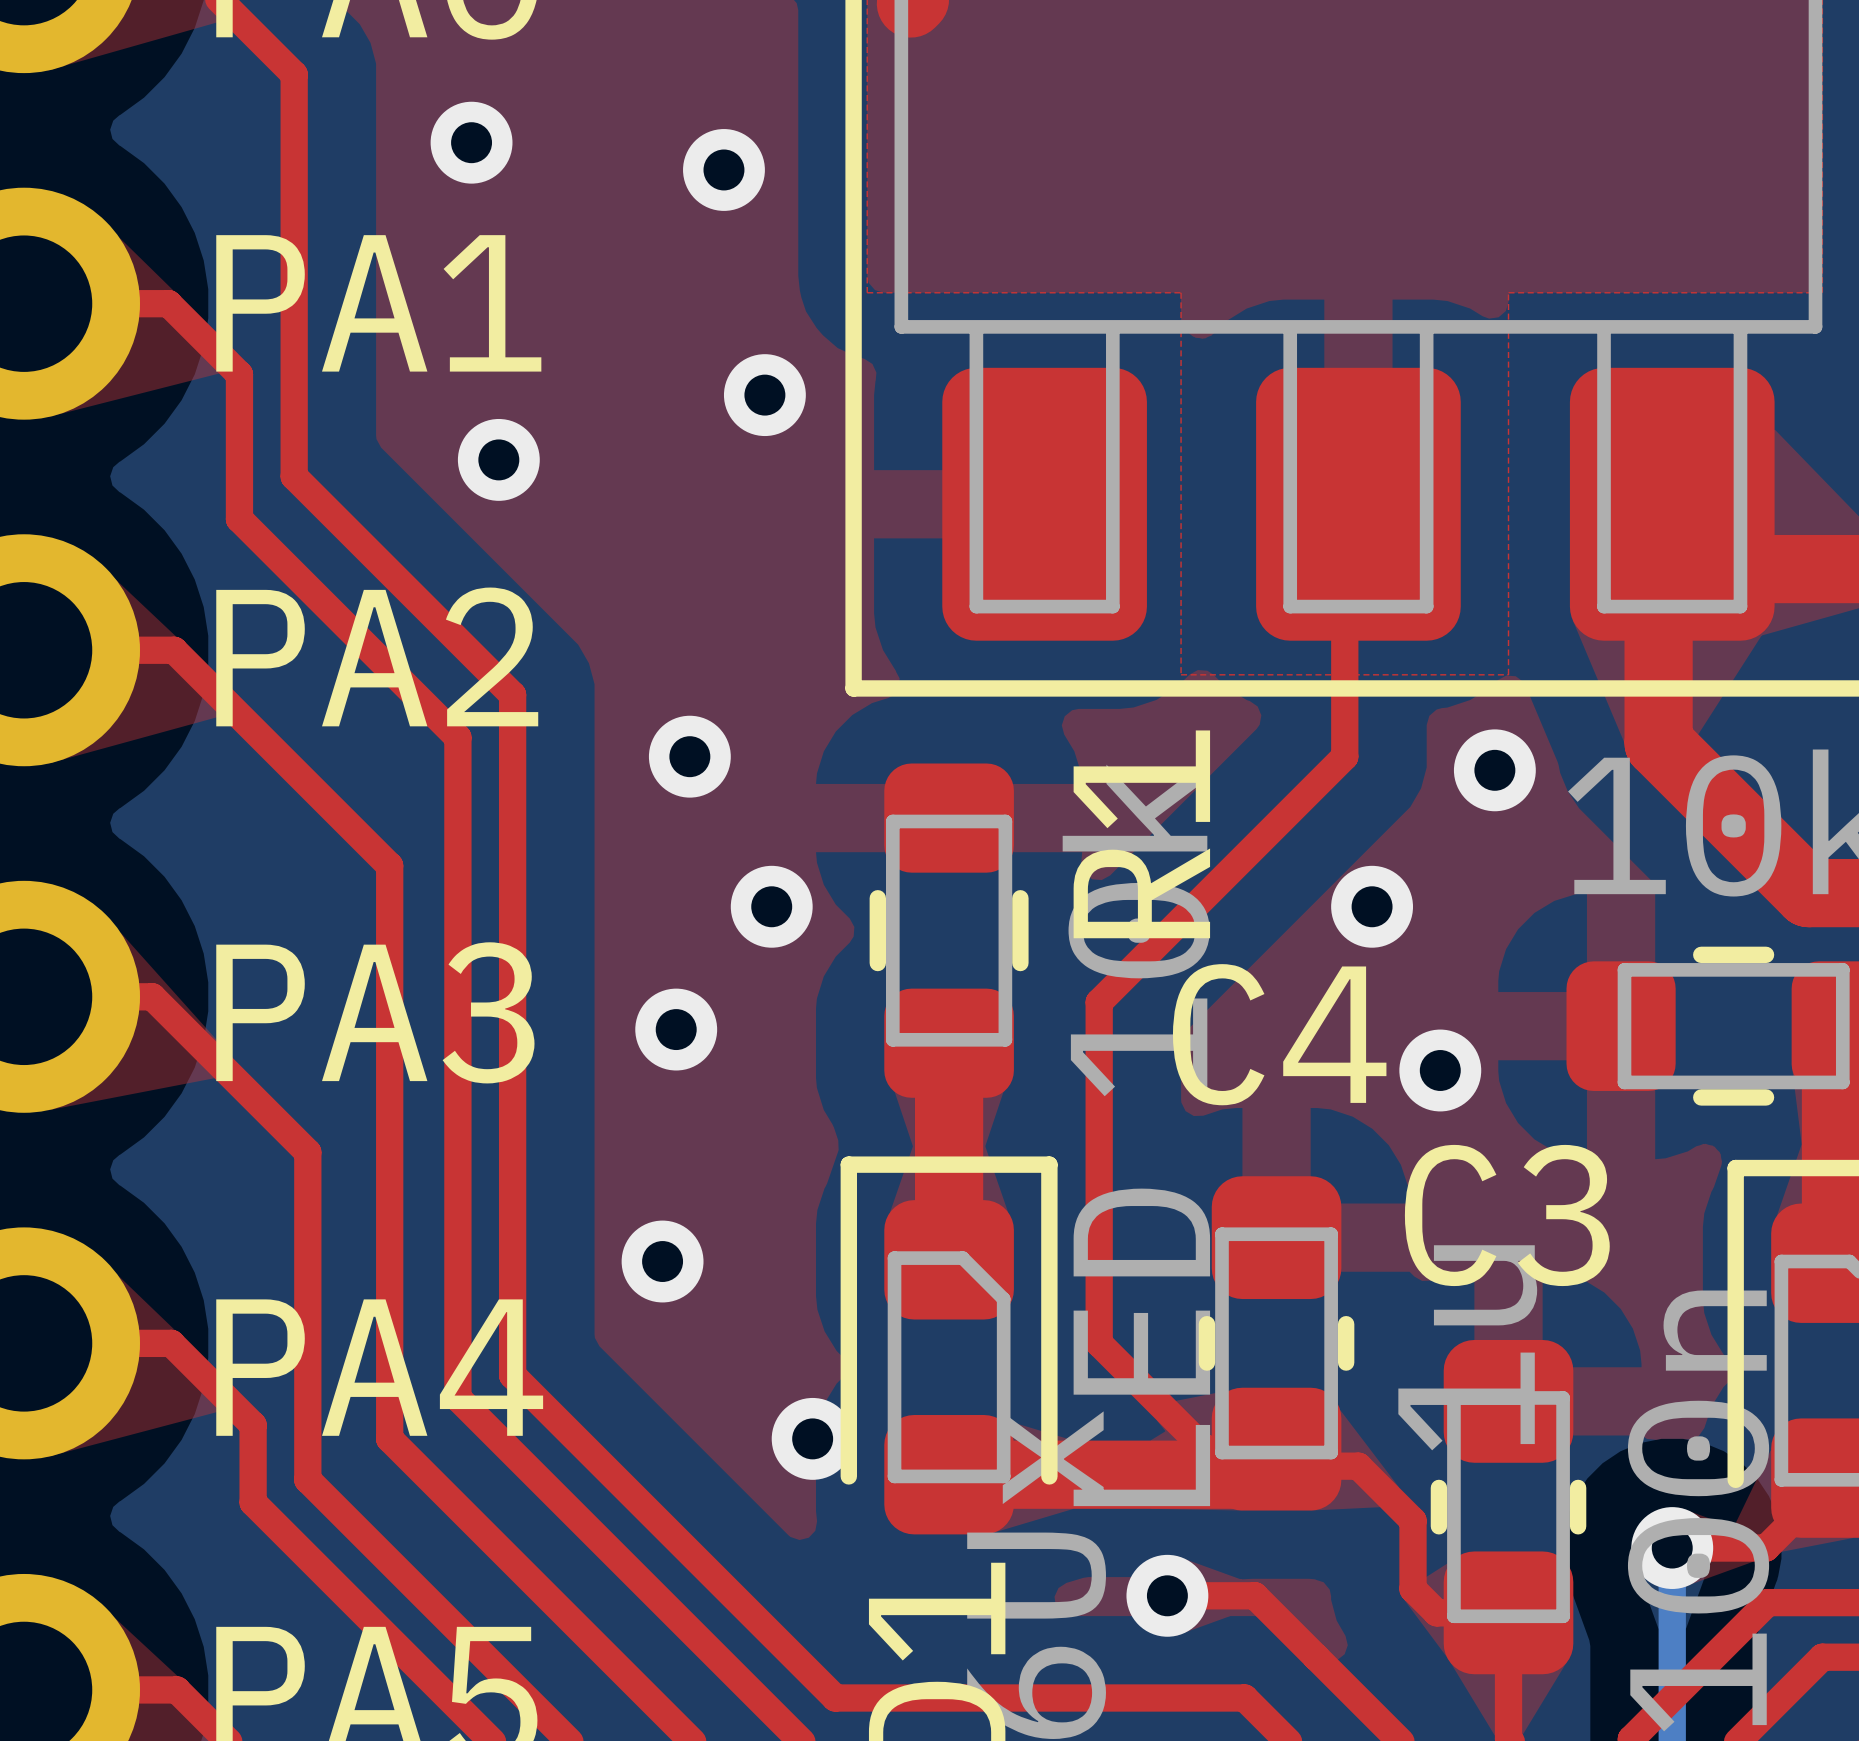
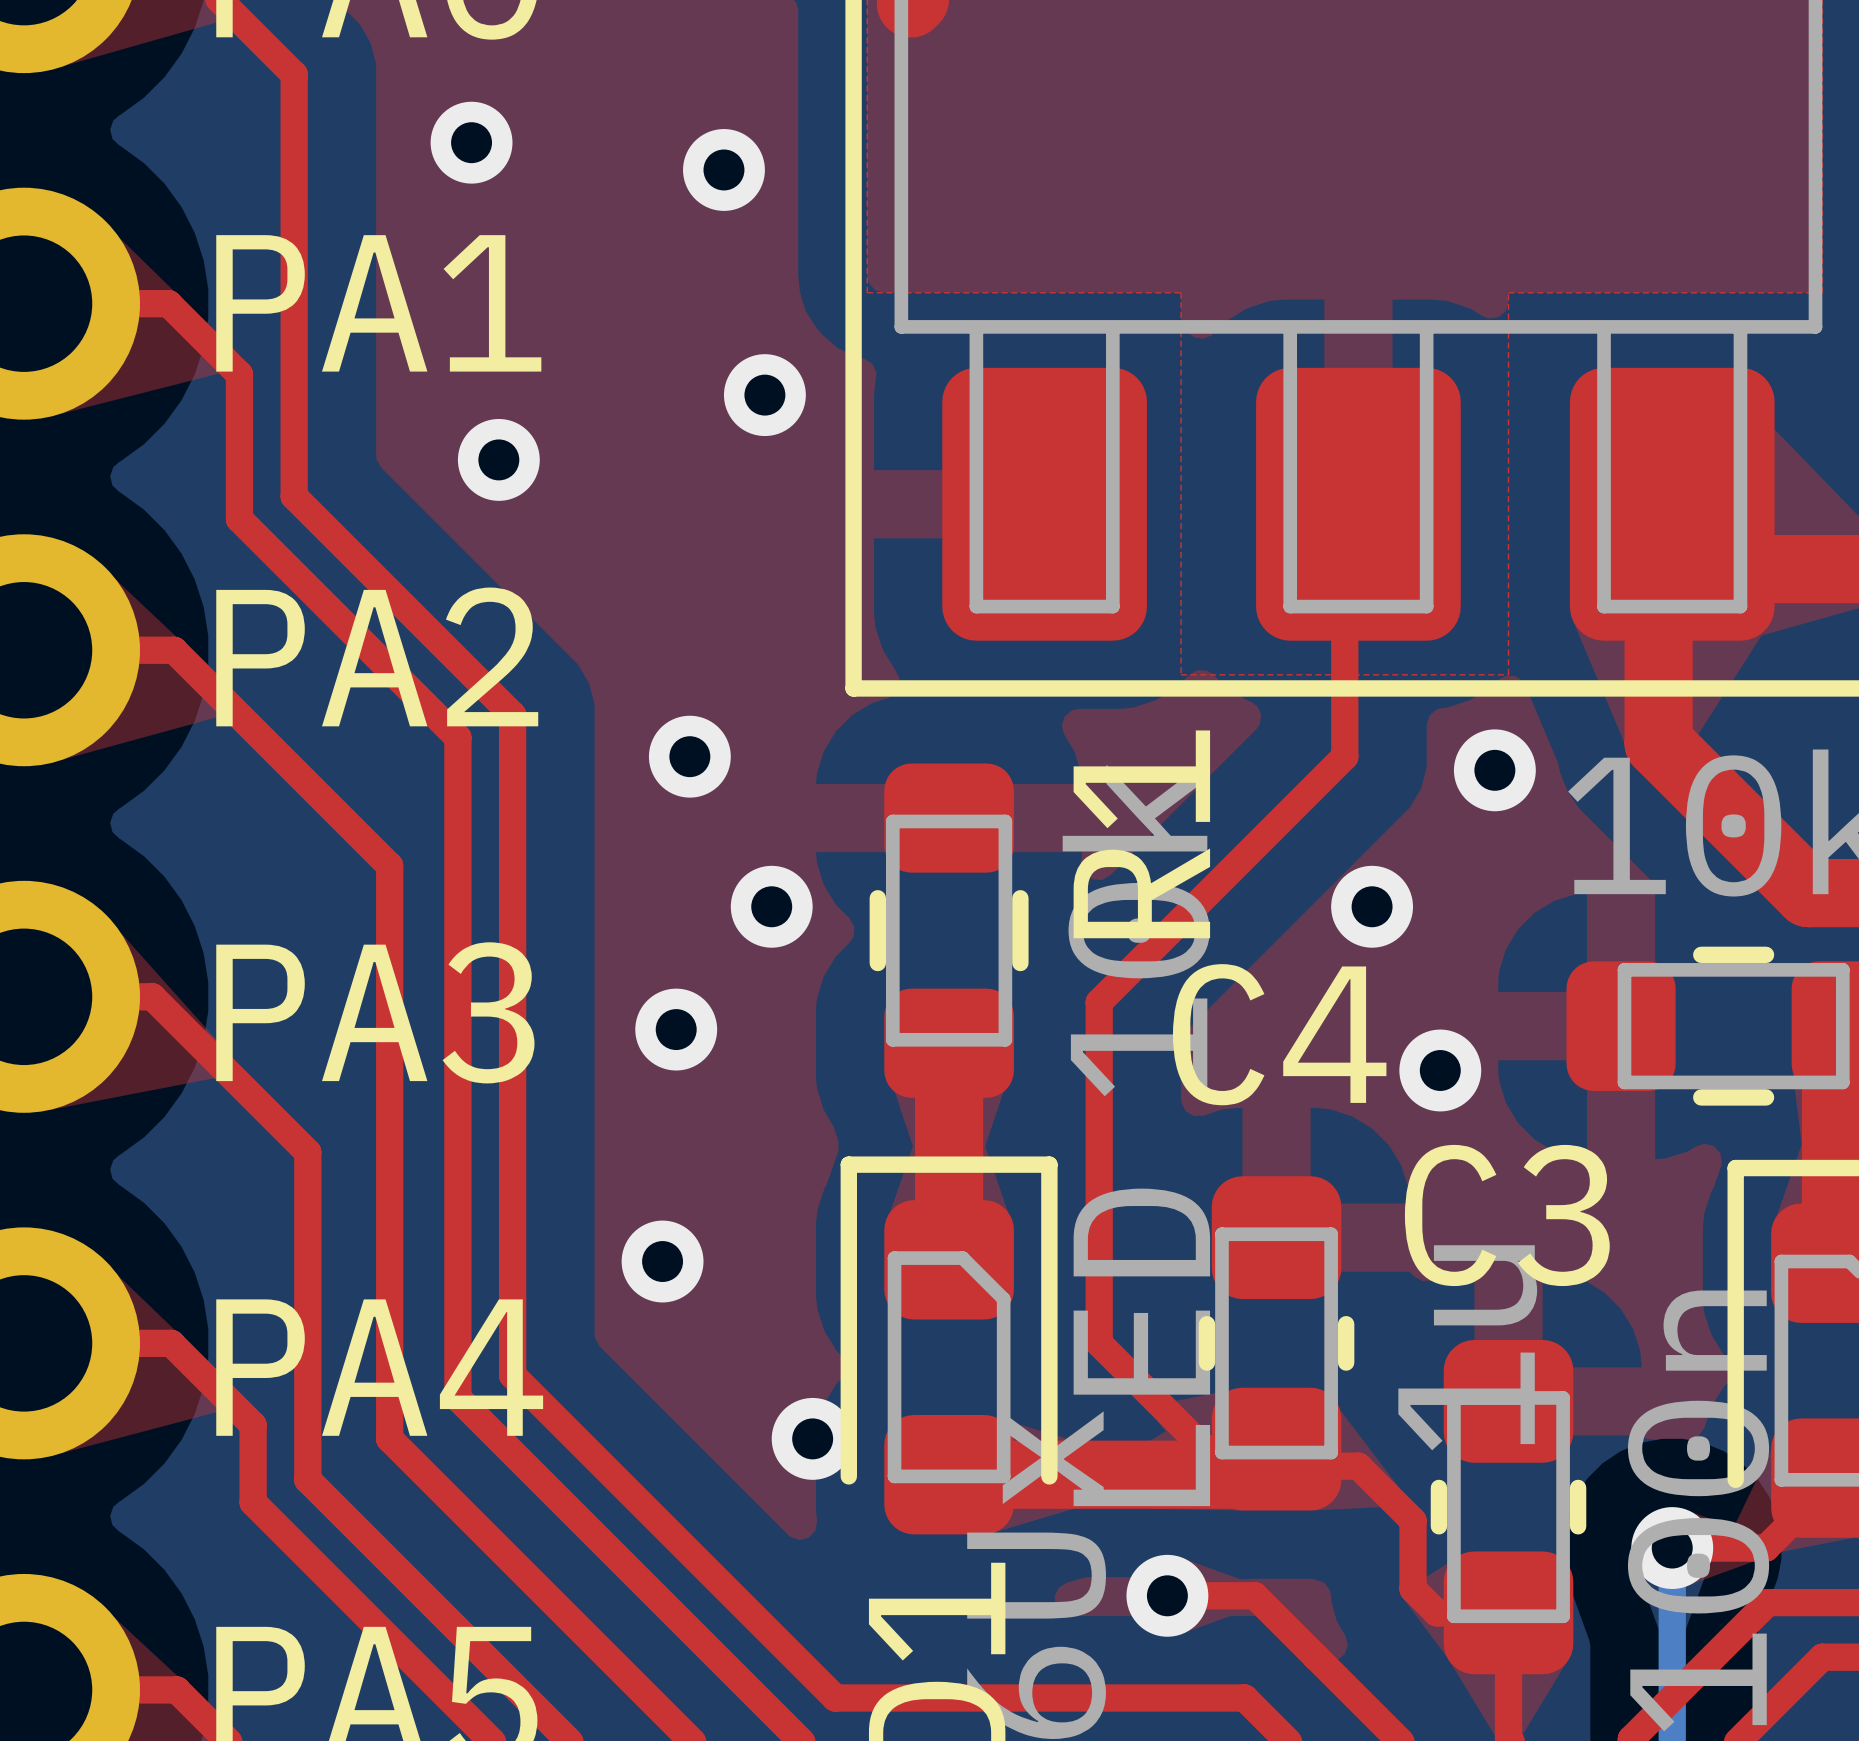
top track: (294, 476) (512, 694) (512, 714) -> (294, 476) (294, 496) (512, 714)

